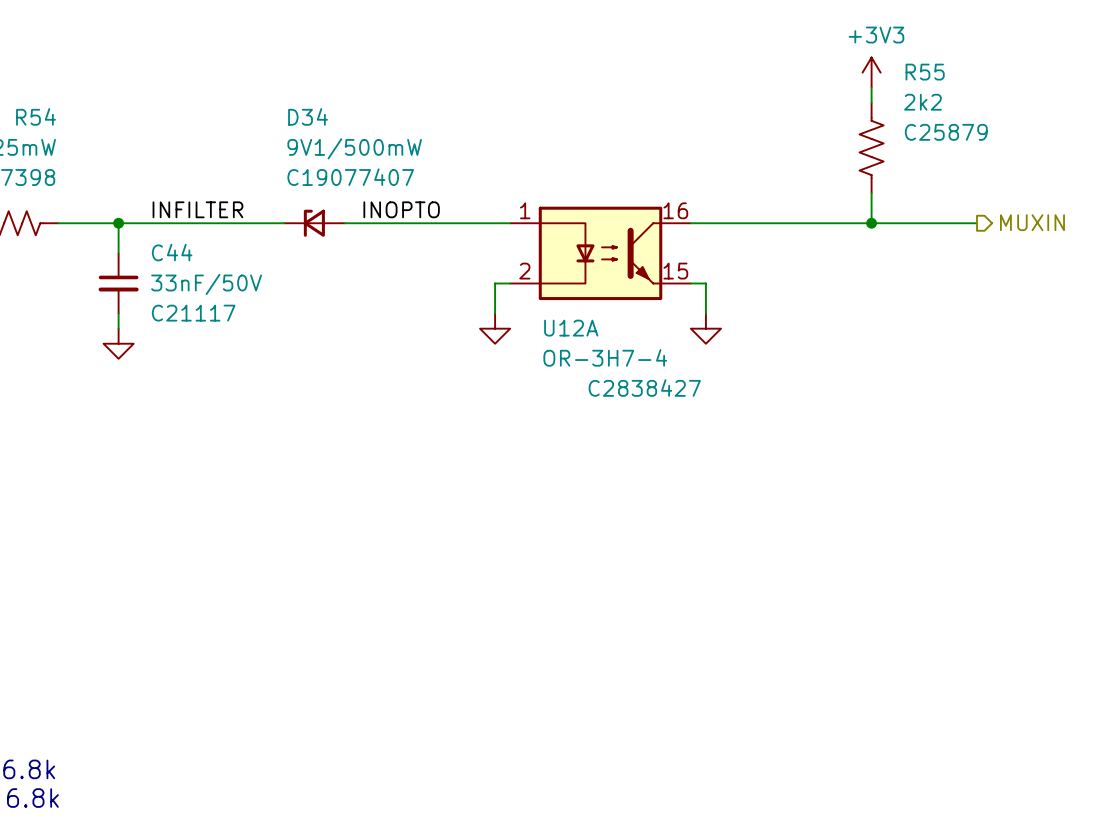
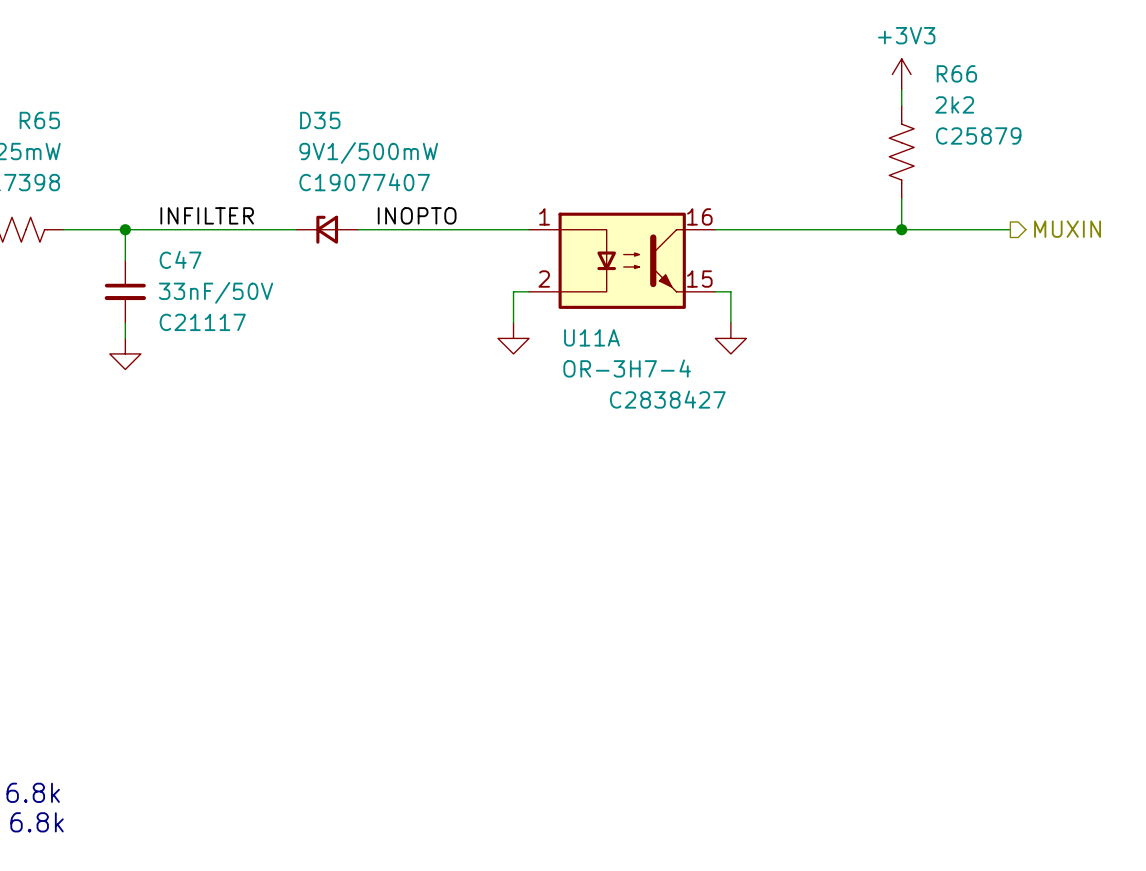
R55 name: R55 (925, 72) -> R66 (956, 73)
R54 name: R54 (36, 116) -> R65 (39, 120)
D34 name: D34 (308, 116) -> D35 (320, 120)
C44 name: C44 (172, 252) -> C47 (180, 259)
U12A name: U12A (571, 328) -> U11A (592, 337)

